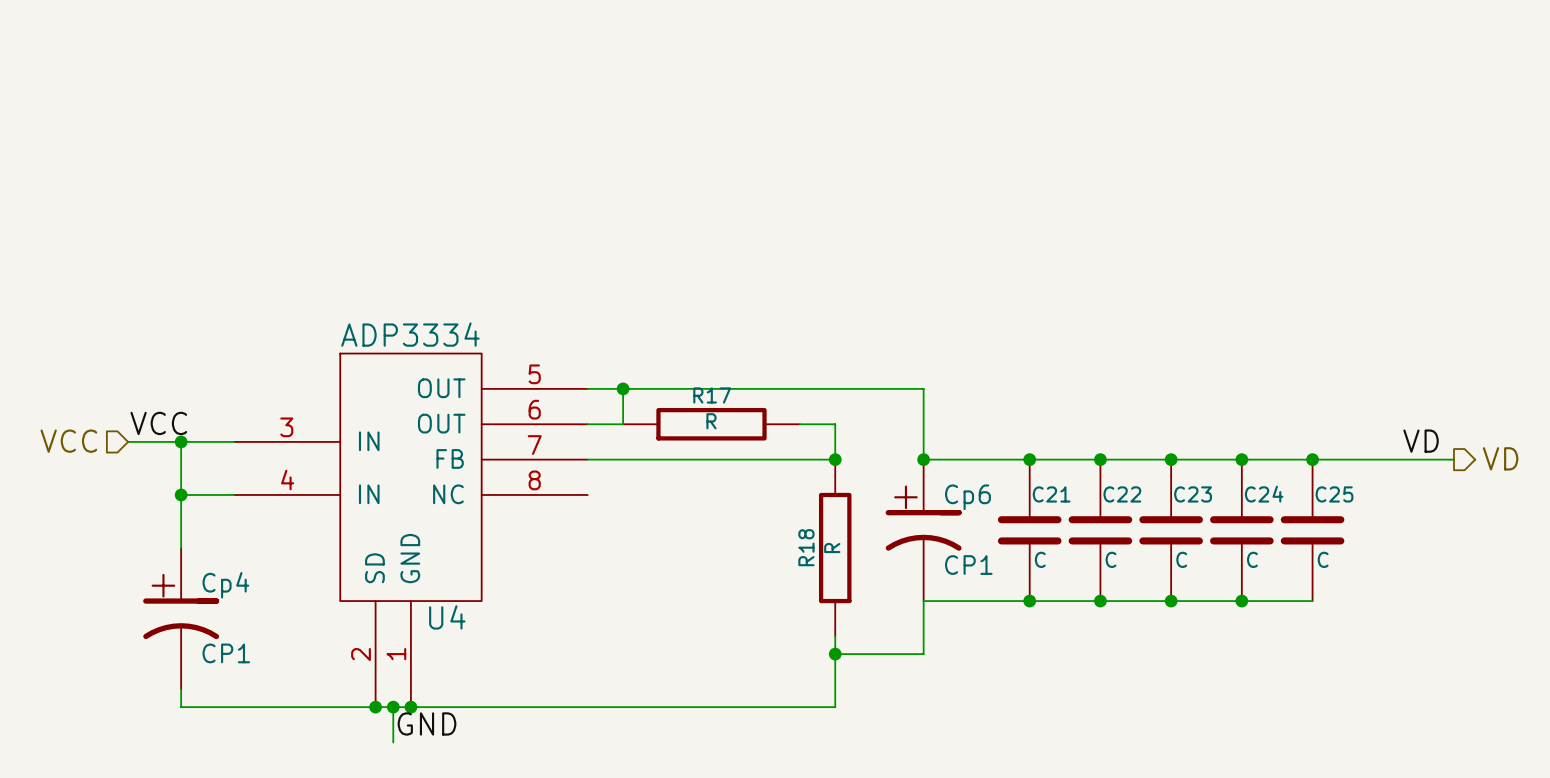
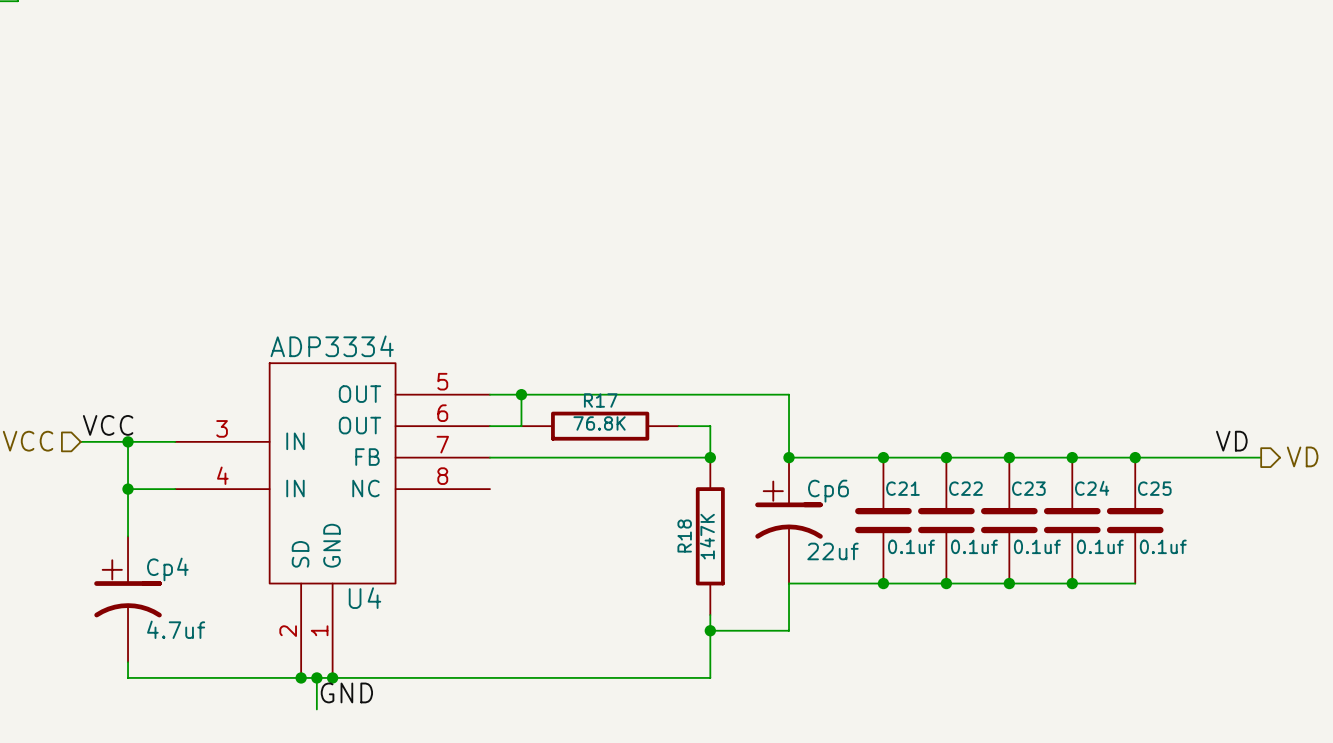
R17 value: R (711, 421) -> 76.8K (599, 423)
R18 value: R (832, 548) -> 147K (707, 536)
C21 value: C (1040, 559) -> 0.1uf (911, 546)
C22 value: C (1111, 559) -> 0.1uf (974, 546)
C23 value: C (1181, 559) -> 0.1uf (1037, 546)
C24 value: C (1252, 559) -> 0.1uf (1100, 546)
C25 value: C (1323, 559) -> 0.1uf (1163, 546)
Cp6 value: CP1 (968, 565) -> 22uf (832, 551)
Cp4 value: CP1 (226, 653) -> 4.7uf (176, 629)

